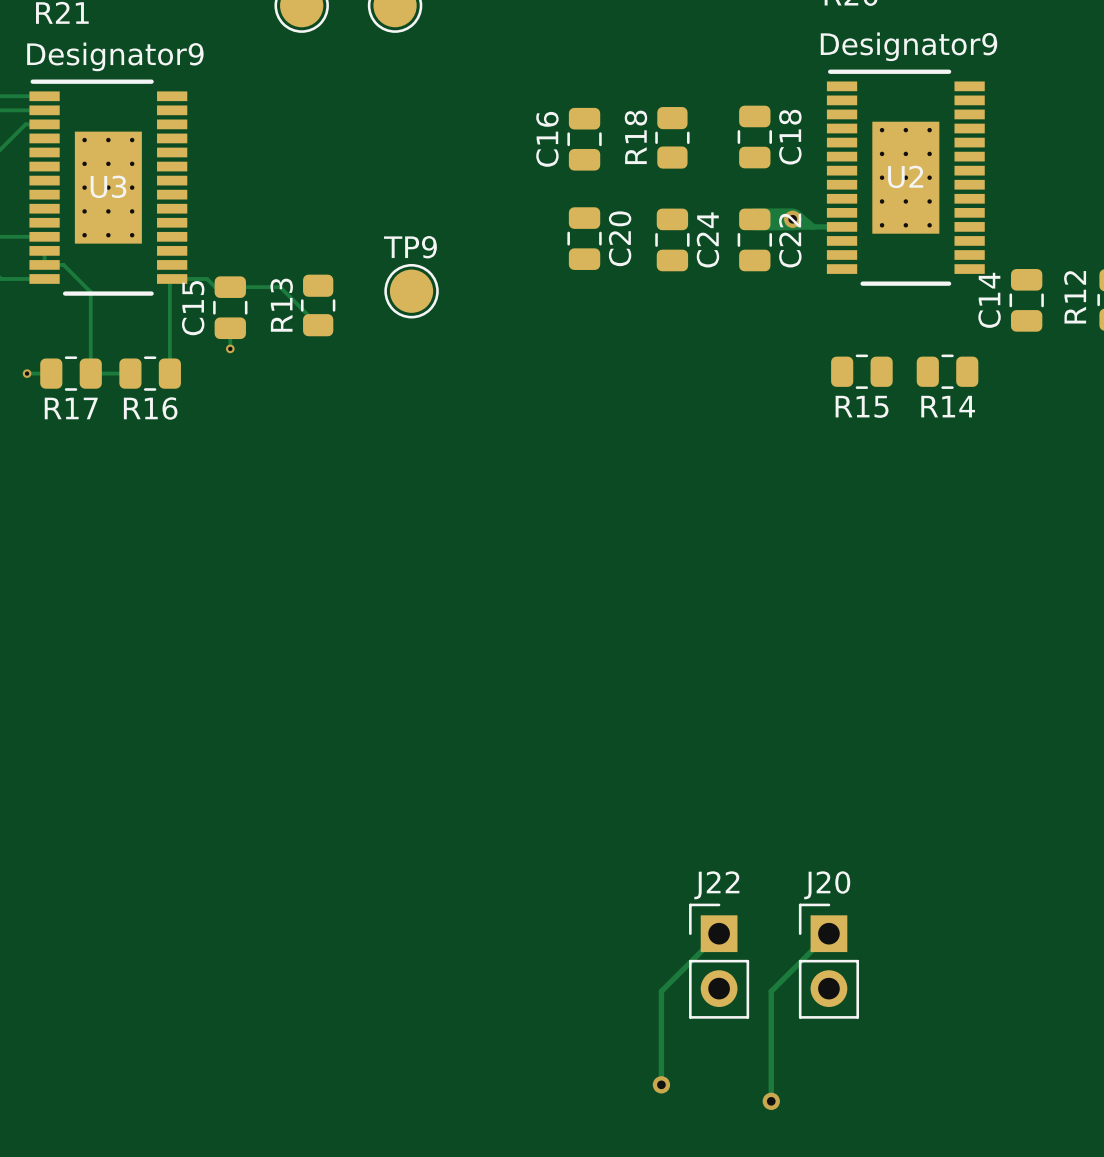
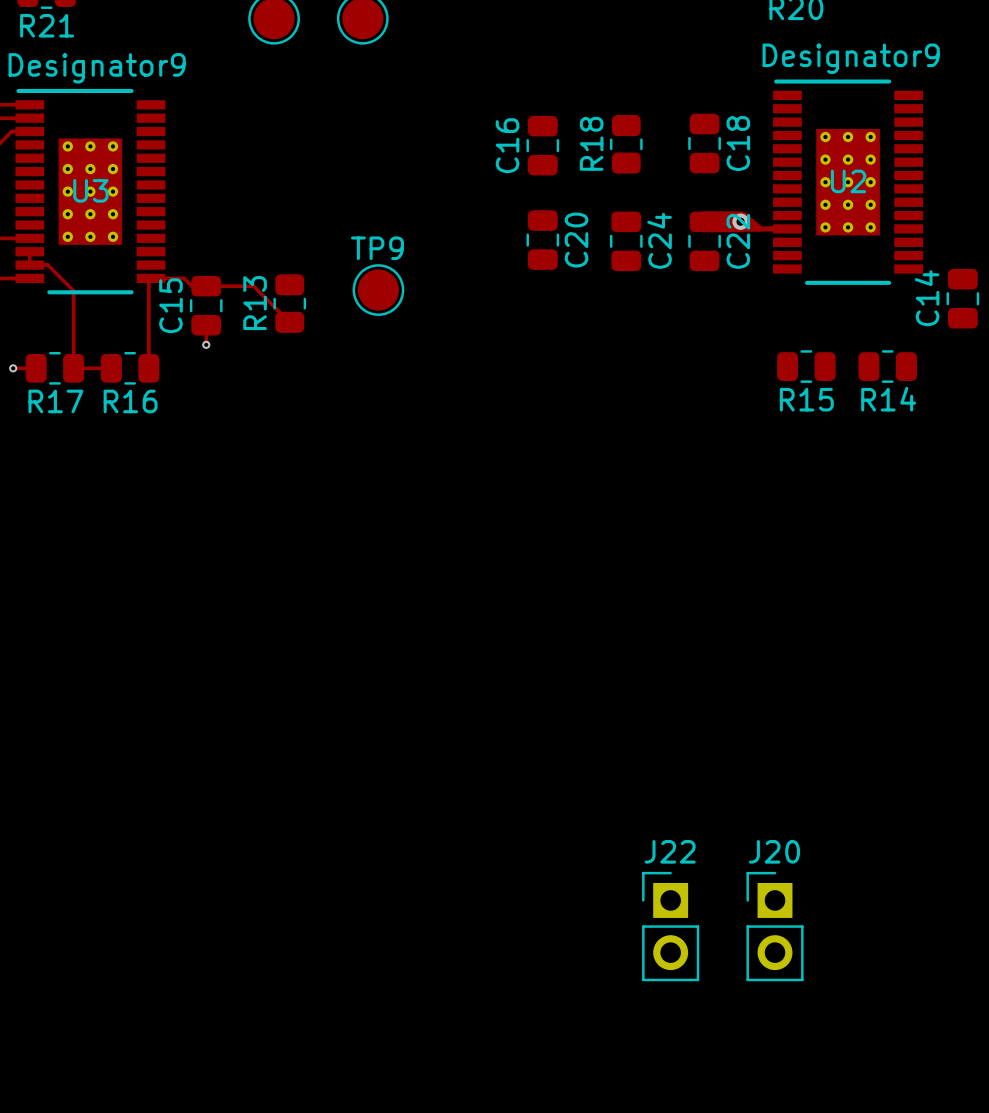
track: (719, 933) (661, 991) (661, 1084) -> none
track: (828, 933) (771, 991) (771, 1101) -> none
via: (661, 1084) -> none
via: (771, 1101) -> none

